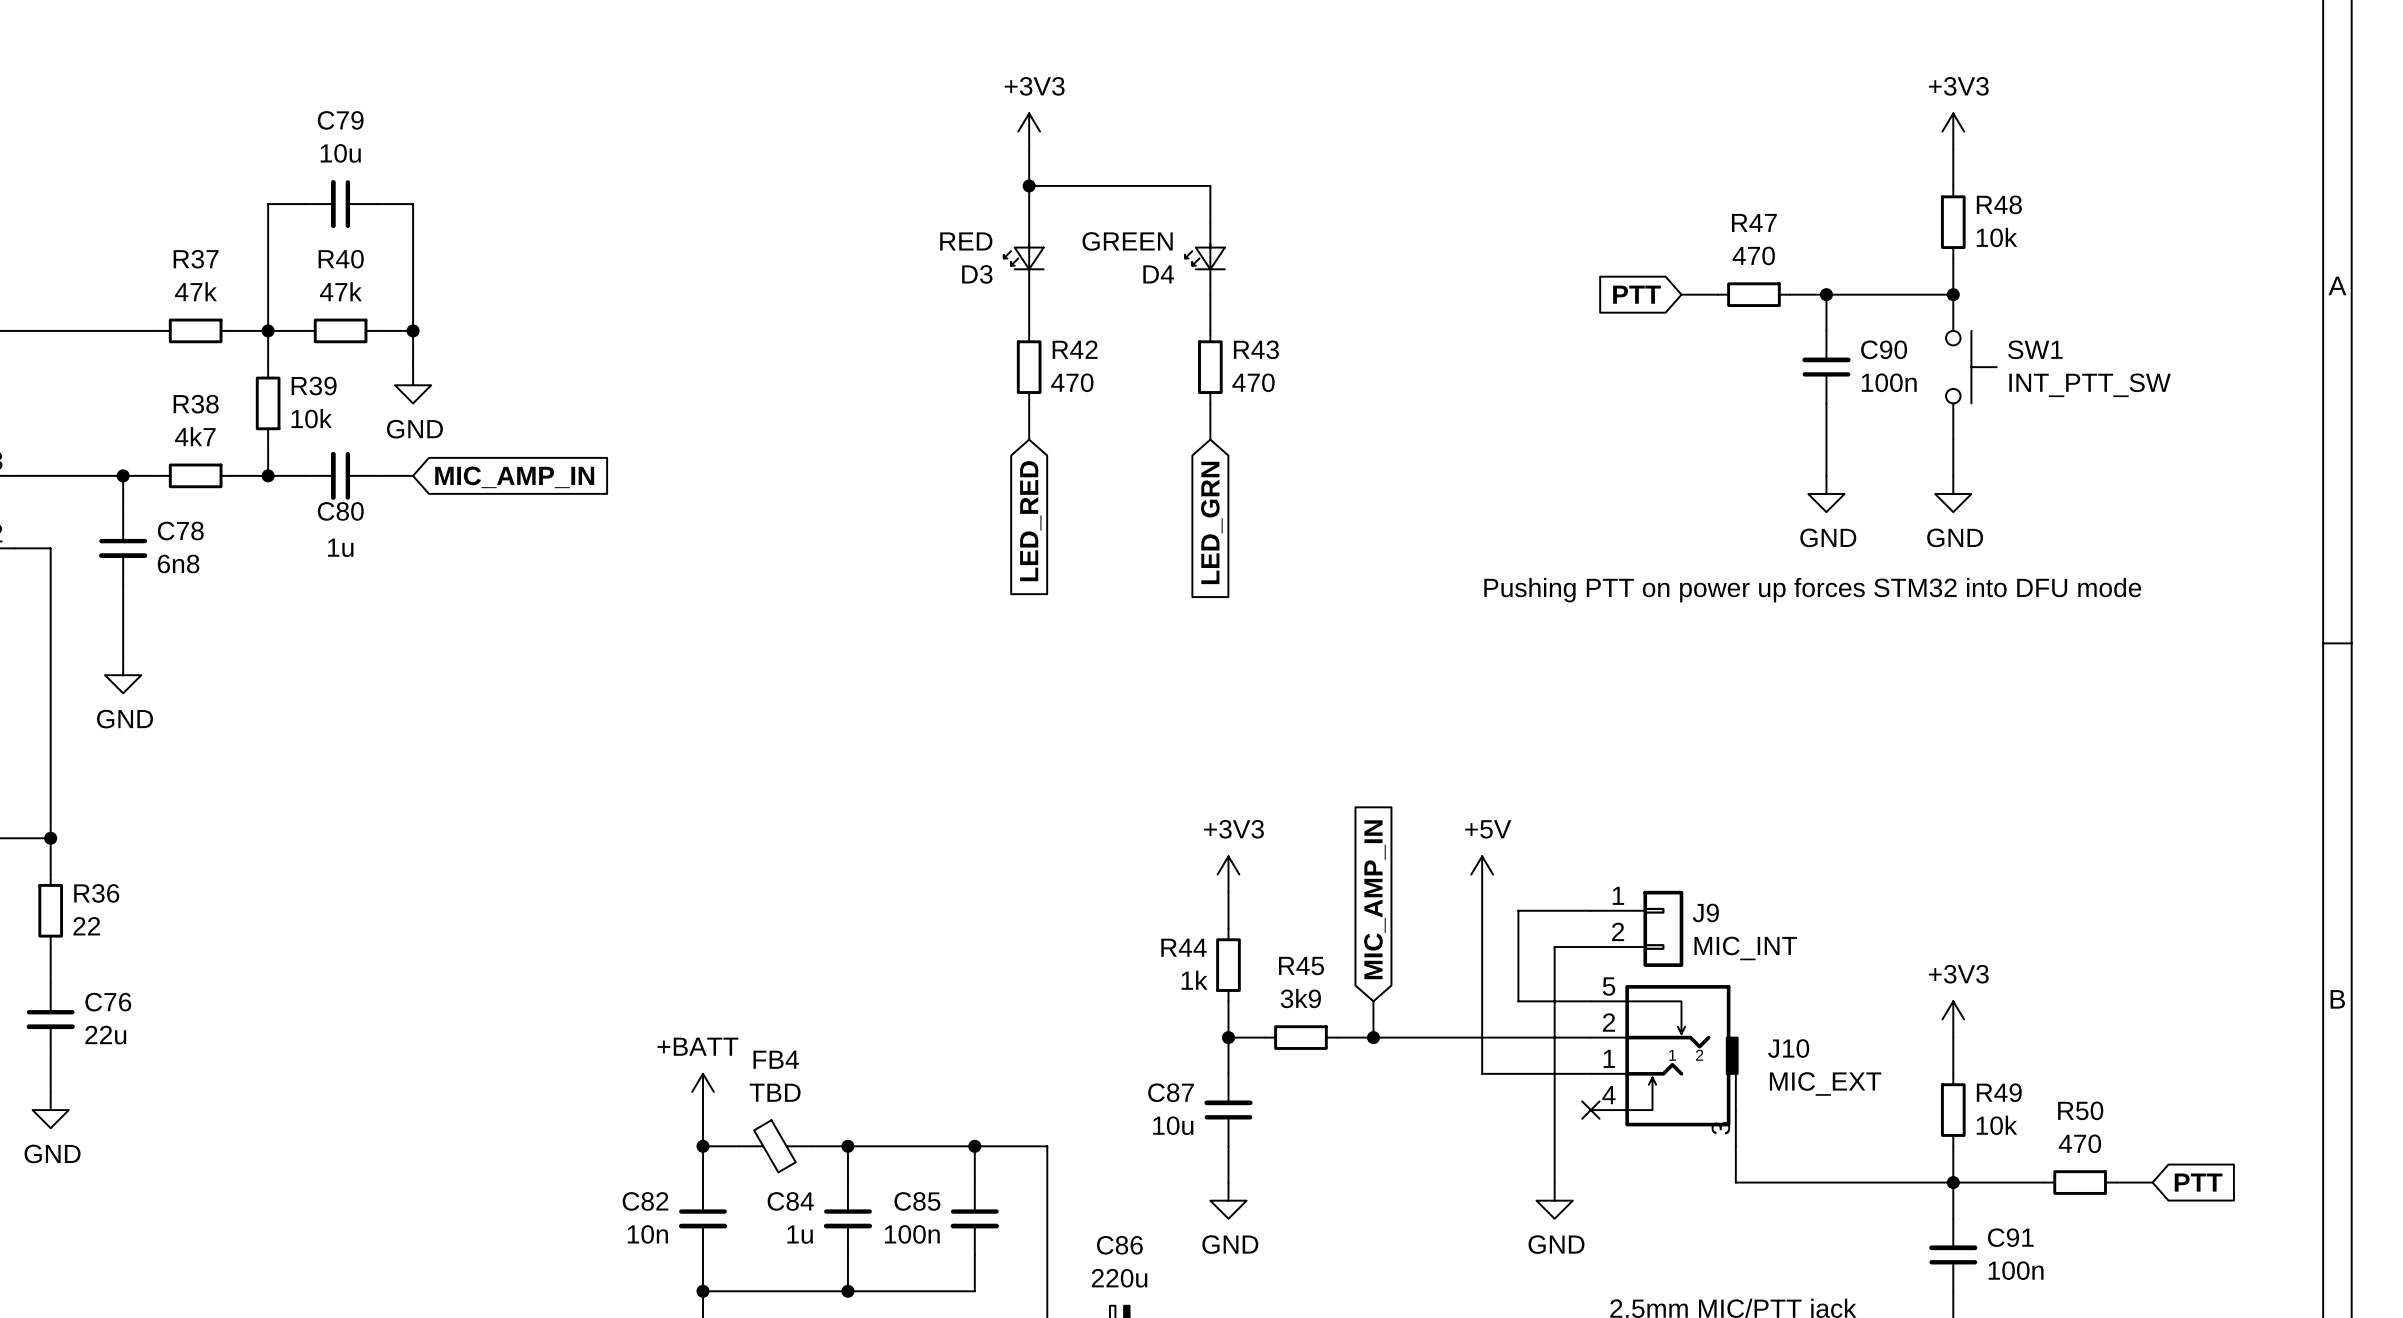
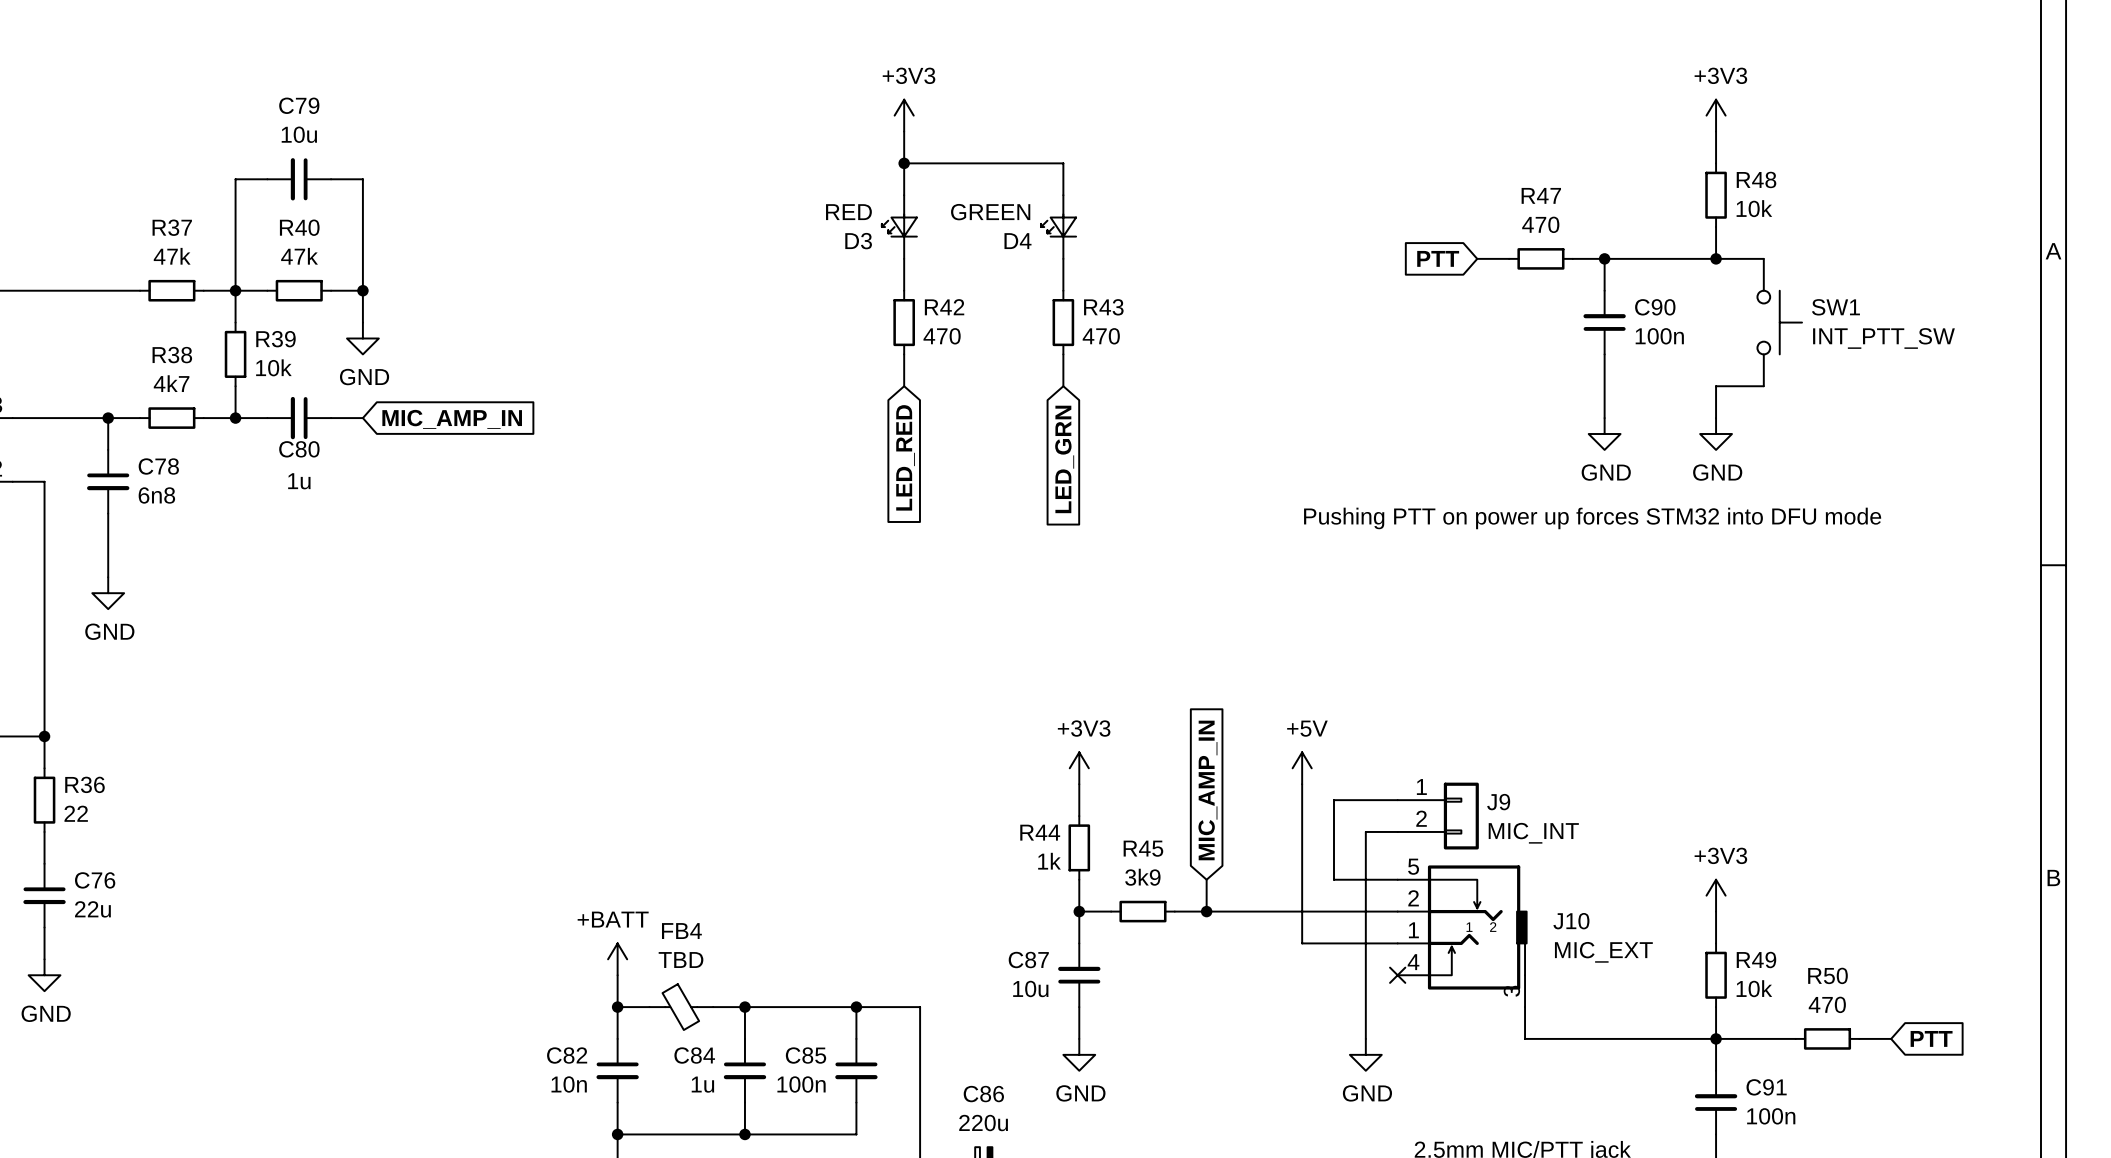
wire: none -> (1716, 258) (1763, 258)
SW1 position: (1971, 367) -> (1779, 322)
wire: none -> (1716, 386) (1763, 386)

